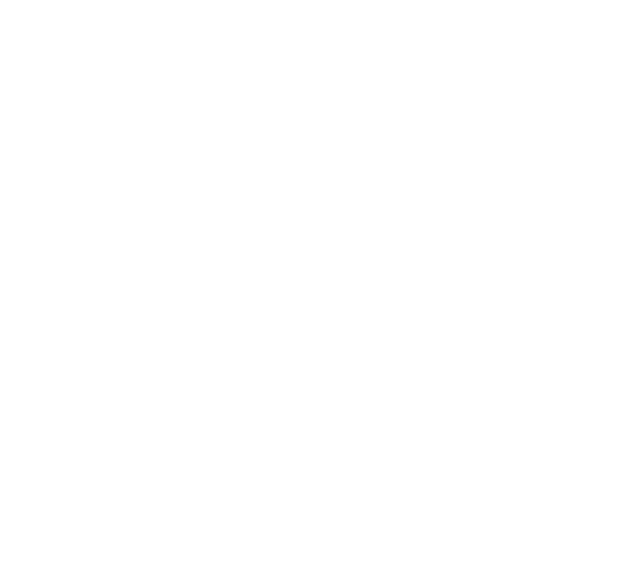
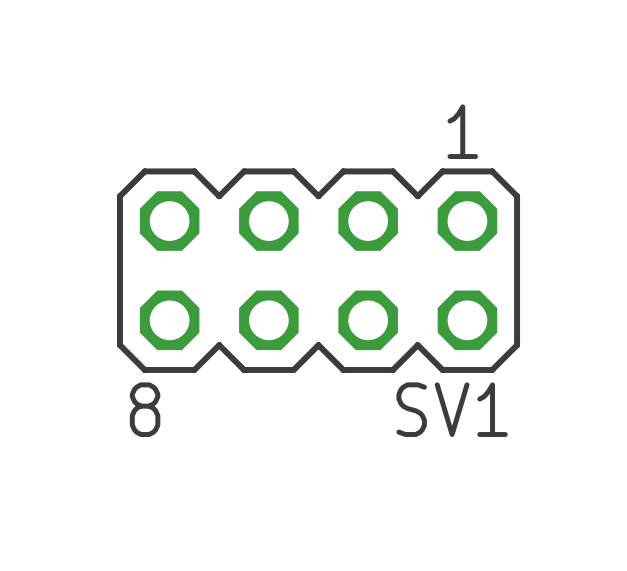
SV1: none -> (318, 270)

